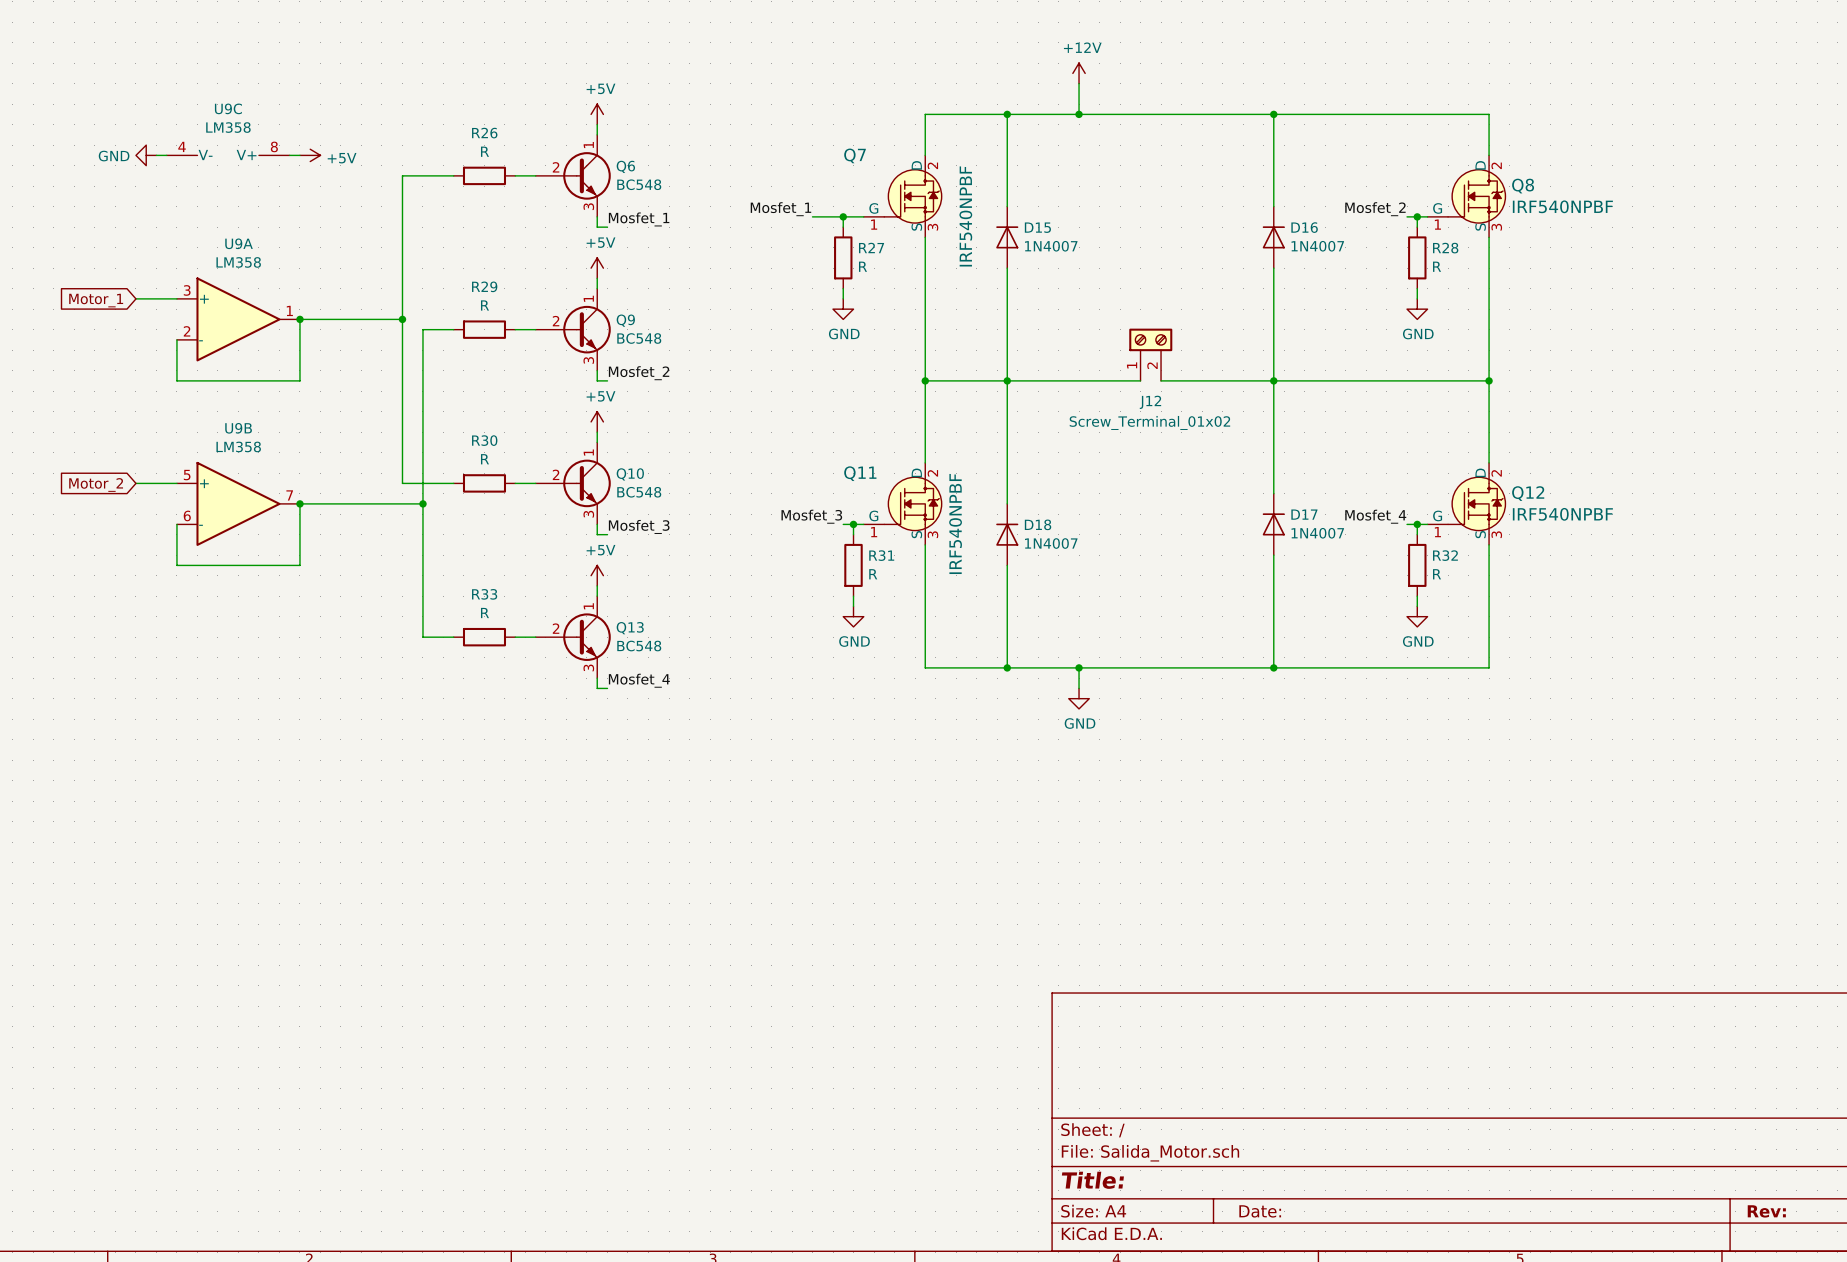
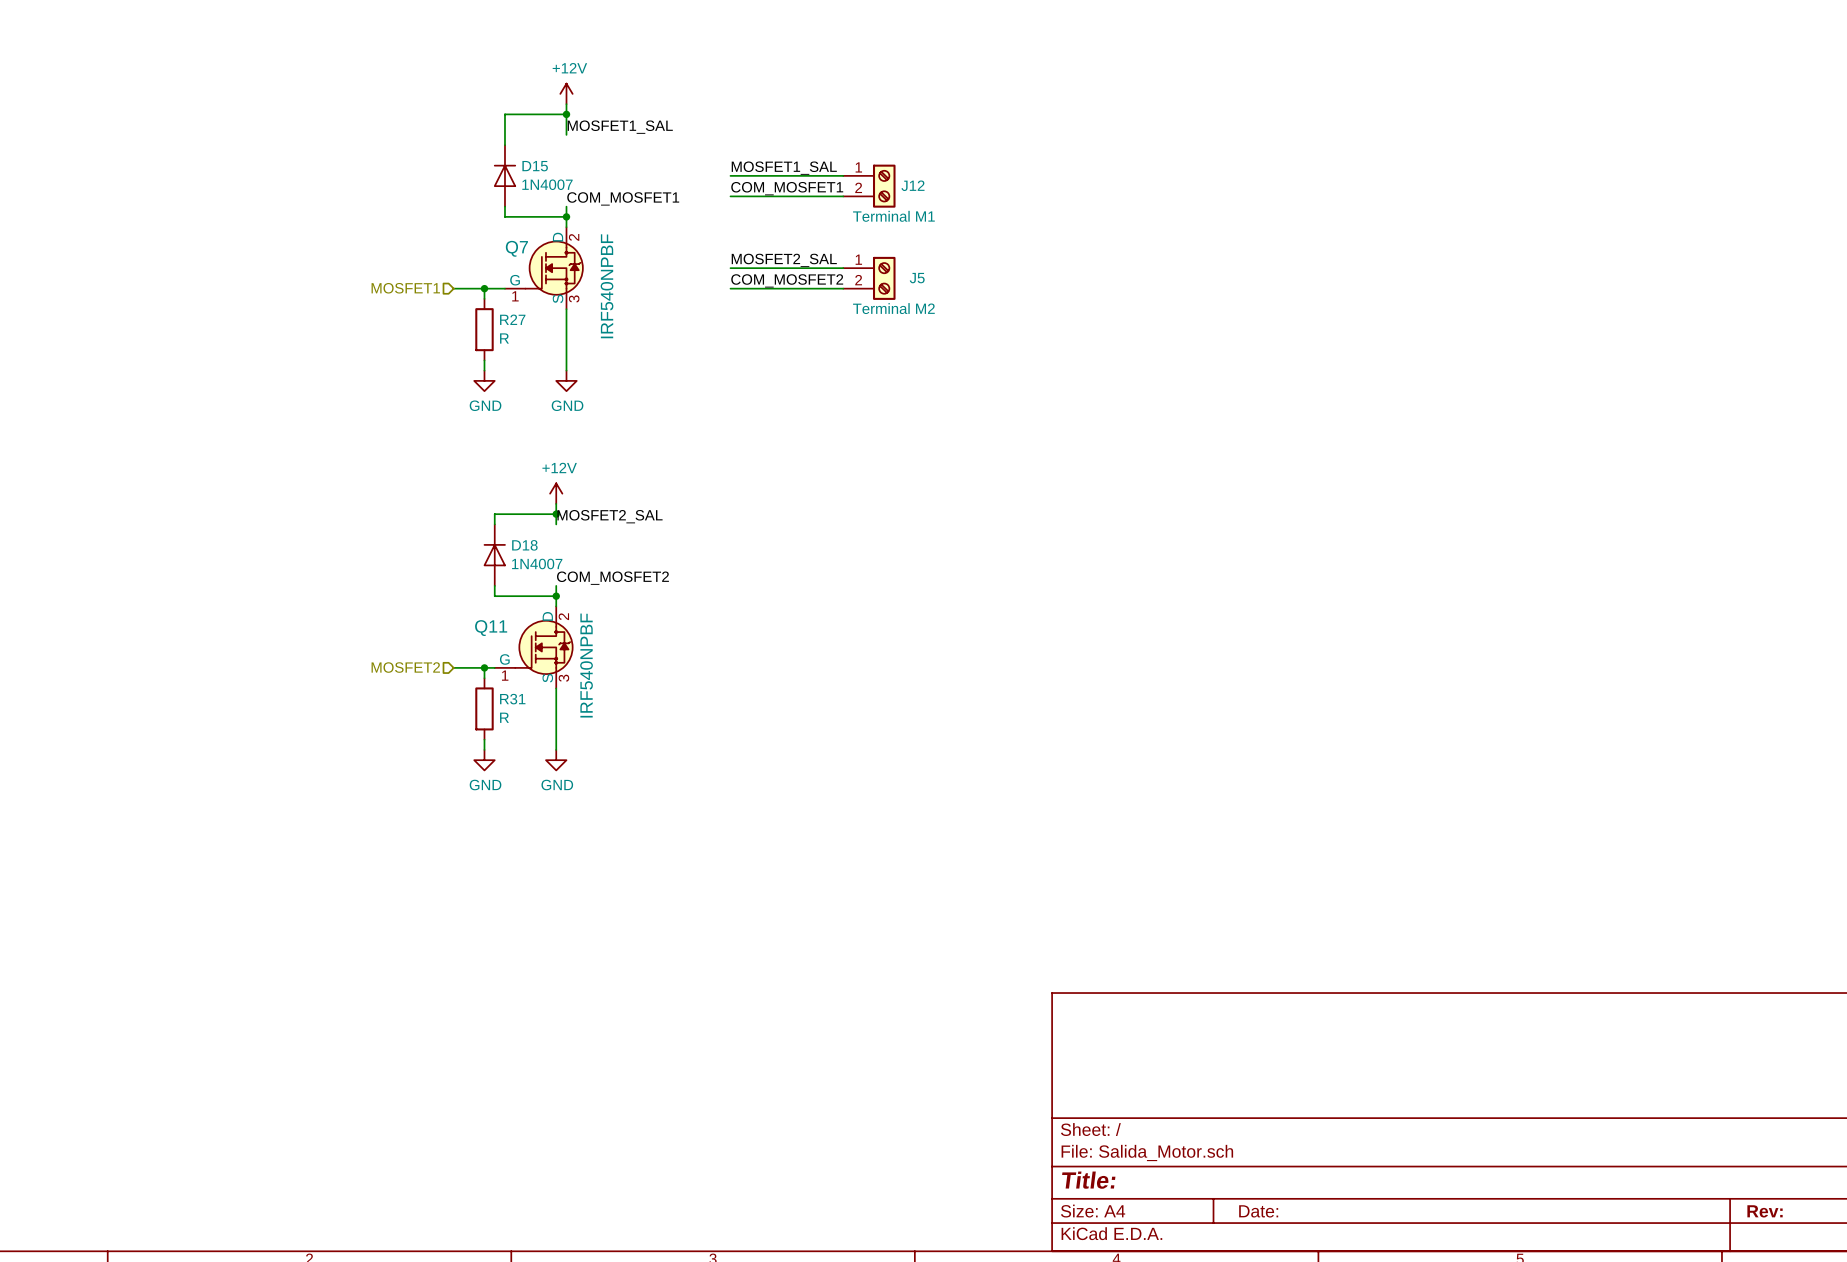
power symbol: +12V (1079, 73) -> none
wire: (1079, 83) (1079, 114) -> none
power symbol: none -> +12V (566, 93)
wire: none -> (566, 104) (566, 134)
wire: none -> (566, 114) (504, 114) (504, 145)
junction: none -> (566, 114)
power symbol: +5V (597, 114) -> none
wire: (1007, 114) (1007, 206) -> none
junction: (1007, 114) -> none
junction: (1079, 114) -> none
wire: (1273, 114) (1273, 206) -> none
junction: (1273, 114) -> none
wire: (597, 124) (597, 134) -> none
label: none -> MOSFET1_SAL (620, 127)
power symbol: GND (146, 155) -> none
wire: (156, 155) (166, 155) -> none
U9C: LM358 (228, 155) -> none
wire: (289, 155) (299, 155) -> none
power symbol: +5V (310, 155) -> none
Q7 name position: Q7 (855, 155) -> Q7 (516, 248)
wire: (925, 155) (925, 114) (1489, 114) (1489, 155) -> none
label: none -> MOSFET1_SAL (784, 168)
wire: (453, 175) (402, 175) (402, 483) (453, 483) -> none
R26: R (484, 175) -> none
wire: (515, 175) (535, 175) -> none
Q6: BC548 (573, 175) -> none
wire: none -> (730, 175) (843, 175)
label: none -> COM_MOSFET1 (787, 188)
wire: none -> (730, 196) (843, 196)
Q7 position: (902, 196) -> (543, 268)
Q8: IRF540NPBF (1466, 196) -> none
label: none -> COM_MOSFET1 (623, 198)
wire: none -> (504, 206) (504, 216) (566, 216)
wire: none -> (566, 206) (566, 227)
label: Mosfet_1 (780, 209) -> none
label: Mosfet_2 (1375, 209) -> none
junction: none -> (566, 216)
wire: (597, 216) (597, 227) (607, 227) -> none
wire: (812, 216) (863, 216) -> none
wire: (843, 216) (843, 227) -> none
junction: (843, 216) -> none
wire: (1407, 216) (1427, 216) -> none
wire: (1417, 216) (1417, 227) -> none
junction: (1417, 216) -> none
label: Mosfet_1 (639, 219) -> none
wire: (925, 237) (925, 462) -> none
D15 position: (1007, 237) -> (504, 175)
D16: 1N4007 (1273, 237) -> none
wire: (1489, 237) (1489, 462) -> none
R27 position: (843, 257) -> (484, 329)
R28: R (1417, 257) -> none
label: none -> MOSFET2_SAL (784, 260)
power symbol: +5V (597, 268) -> none
wire: none -> (730, 268) (843, 268)
wire: (1007, 268) (1007, 503) -> none
wire: (1273, 268) (1273, 493) -> none
wire: (597, 278) (597, 288) -> (484, 360) (484, 370)
J5: none -> Terminal M2 (869, 278)
label: none -> COM_MOSFET2 (787, 280)
hierarchical label: none -> MOSFET1 (405, 288)
wire: none -> (453, 288) (504, 288)
junction: none -> (484, 288)
wire: (843, 288) (843, 298) -> (843, 288) (730, 288)
wire: (1417, 288) (1417, 298) -> none
wire: (135, 298) (176, 298) -> none
global label: Motor_1 (96, 300) -> none
wire: none -> (566, 309) (566, 370)
power symbol: GND (843, 309) -> none
power symbol: GND (1417, 309) -> none
U9A: LM358 (238, 319) -> none
junction: (299, 319) -> none
wire: (402, 319) (299, 319) (299, 380) (176, 380) (176, 339) -> none
junction: (402, 319) -> none
wire: (453, 329) (422, 329) (422, 637) (453, 637) -> none
R29: R (484, 329) -> none
wire: (515, 329) (535, 329) -> none
Q9: BC548 (573, 329) -> none
J12 rotation: 0° (1150, 339) -> 90° clockwise (884, 186)
J12 position: (1150, 354) -> (869, 186)
wire: (597, 370) (597, 380) (607, 380) -> none
label: Mosfet_2 (639, 373) -> none
power symbol: none -> GND (484, 380)
power symbol: none -> GND (566, 380)
wire: (925, 380) (1140, 380) -> none
junction: (925, 380) -> none
junction: (1007, 380) -> none
wire: (1161, 380) (1489, 380) -> none
junction: (1273, 380) -> none
junction: (1489, 380) -> none
J12 name position: J12 (1150, 402) -> J12 (912, 185)
power symbol: +5V (597, 421) -> none
J12 value: Screw_Terminal_01x02 (1149, 422) -> Terminal M1 (893, 216)
wire: (597, 432) (597, 442) -> (484, 288) (484, 298)
Q11 name position: Q11 (860, 473) -> Q11 (491, 628)
wire: (135, 483) (176, 483) -> none
R30: R (484, 483) -> none
wire: (515, 483) (535, 483) -> none
Q10: BC548 (573, 483) -> none
global label: Motor_2 (96, 484) -> none
power symbol: none -> +12V (556, 493)
U9B: LM358 (238, 503) -> none
junction: (299, 503) -> none
wire: (422, 503) (299, 503) (299, 565) (176, 565) (176, 524) -> none
junction: (422, 503) -> none
wire: none -> (556, 503) (556, 524)
Q11 position: (902, 503) -> (533, 647)
Q12: IRF540NPBF (1466, 503) -> none
wire: none -> (556, 514) (494, 514) (494, 524)
junction: none -> (556, 514)
label: none -> MOSFET2_SAL (610, 516)
label: Mosfet_3 (811, 516) -> none
label: Mosfet_4 (1375, 516) -> none
wire: (597, 524) (597, 534) (607, 534) -> none
wire: (843, 524) (863, 524) -> none
wire: (853, 524) (853, 534) -> none
junction: (853, 524) -> none
D17: 1N4007 (1273, 524) -> none
wire: (1407, 524) (1427, 524) -> none
wire: (1417, 524) (1417, 534) -> none
junction: (1417, 524) -> none
label: Mosfet_3 (639, 526) -> none
D18 position: (1007, 534) -> (494, 555)
wire: (925, 544) (925, 667) (1489, 667) (1489, 544) -> none
wire: (1273, 555) (1273, 667) -> none
R31 position: (853, 565) -> (484, 708)
wire: (1007, 565) (1007, 667) -> none
R32: R (1417, 565) -> none
power symbol: +5V (597, 575) -> none
label: none -> COM_MOSFET2 (612, 578)
wire: none -> (494, 585) (494, 596) (556, 596)
wire: none -> (556, 585) (556, 606)
wire: (597, 585) (597, 596) -> (484, 667) (484, 678)
junction: none -> (556, 596)
wire: (853, 596) (853, 606) -> none
wire: (1417, 596) (1417, 606) -> none
power symbol: GND (853, 616) -> none
power symbol: GND (1417, 616) -> none
R33: R (484, 637) -> none
Q13: BC548 (573, 637) -> none
hierarchical label: none -> MOSFET2 (405, 667)
wire: none -> (453, 667) (494, 667)
junction: none -> (484, 667)
junction: (1007, 667) -> none
wire: (1079, 667) (1079, 688) -> none
junction: (1079, 667) -> none
junction: (1273, 667) -> none
wire: (597, 678) (597, 688) (607, 688) -> none
label: Mosfet_4 (639, 680) -> none
wire: none -> (556, 688) (556, 749)
power symbol: GND (1079, 698) -> none
wire: none -> (484, 739) (484, 749)
power symbol: none -> GND (484, 760)
power symbol: none -> GND (556, 760)

